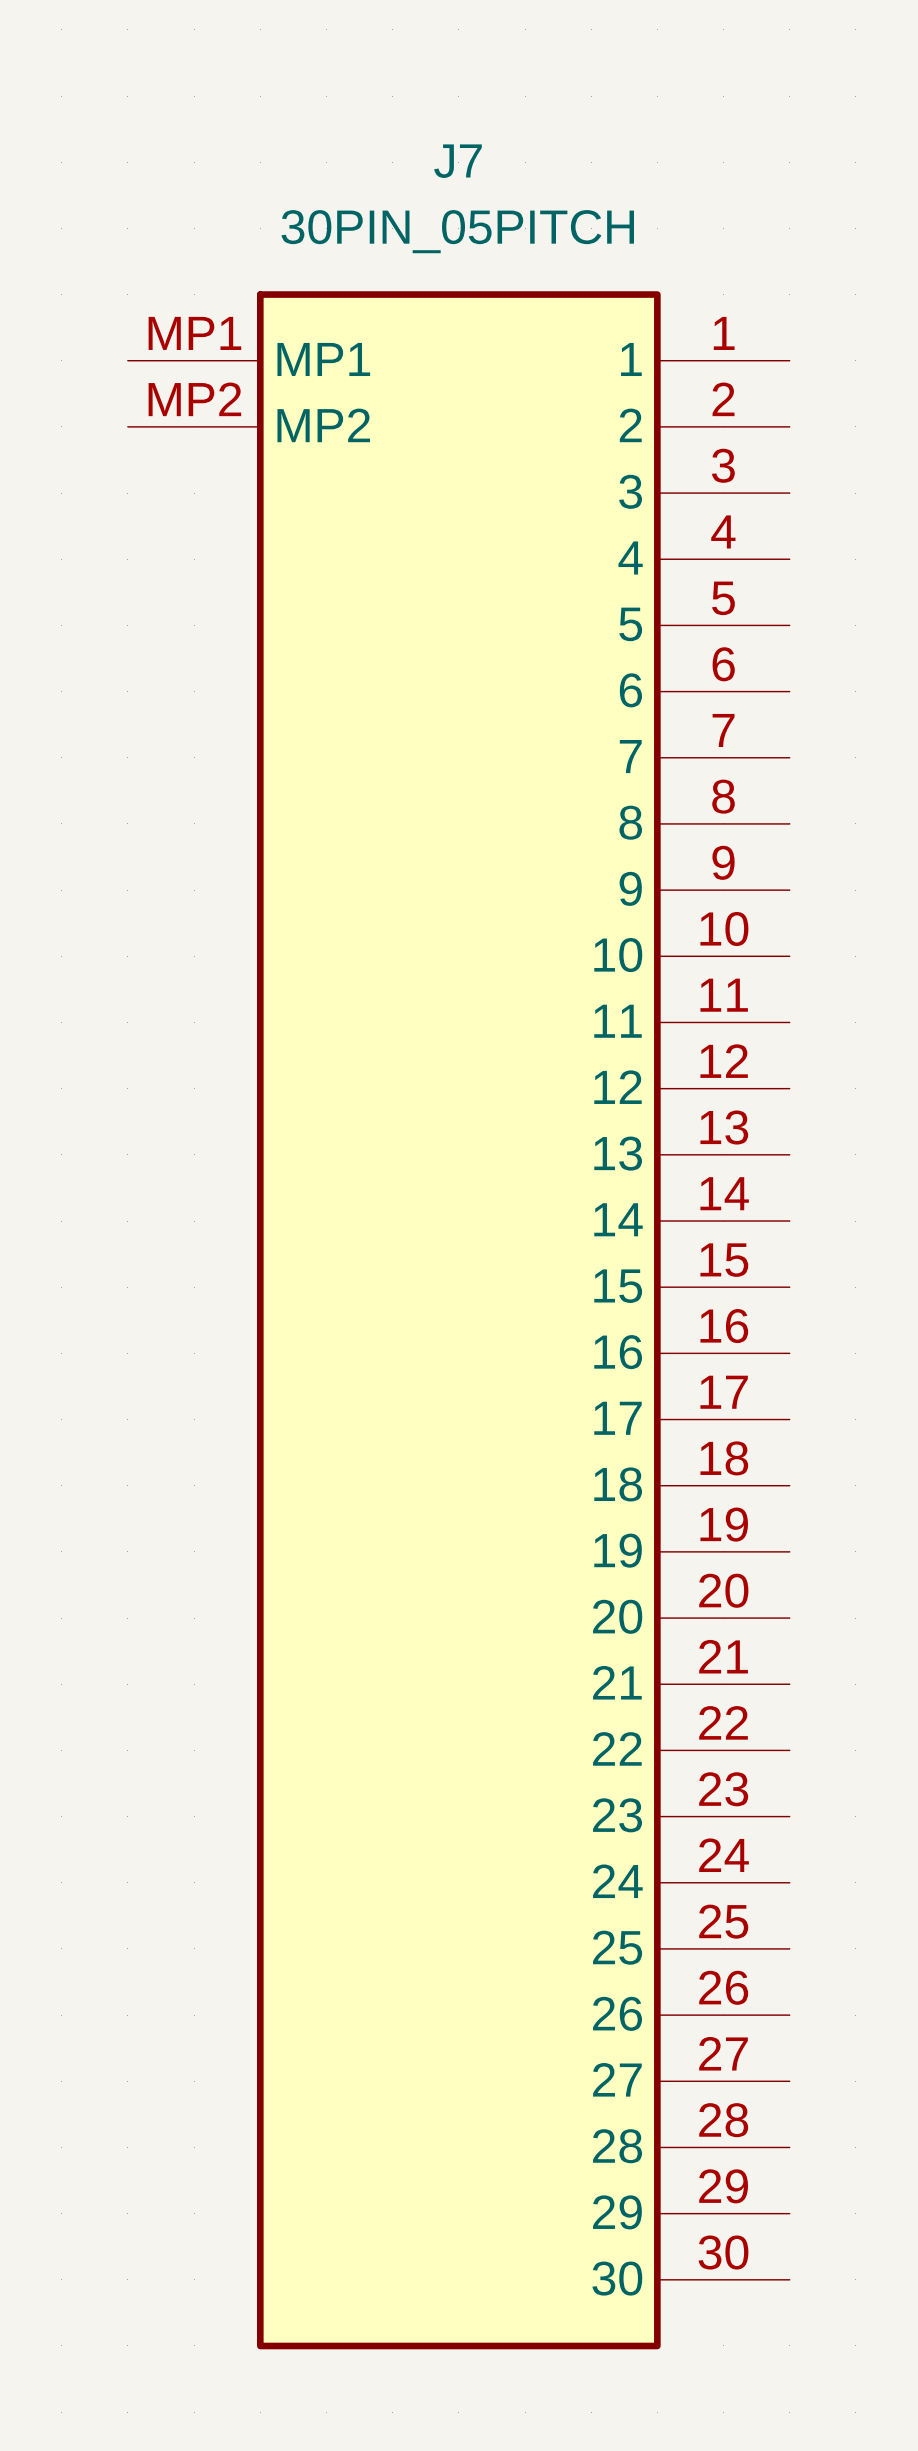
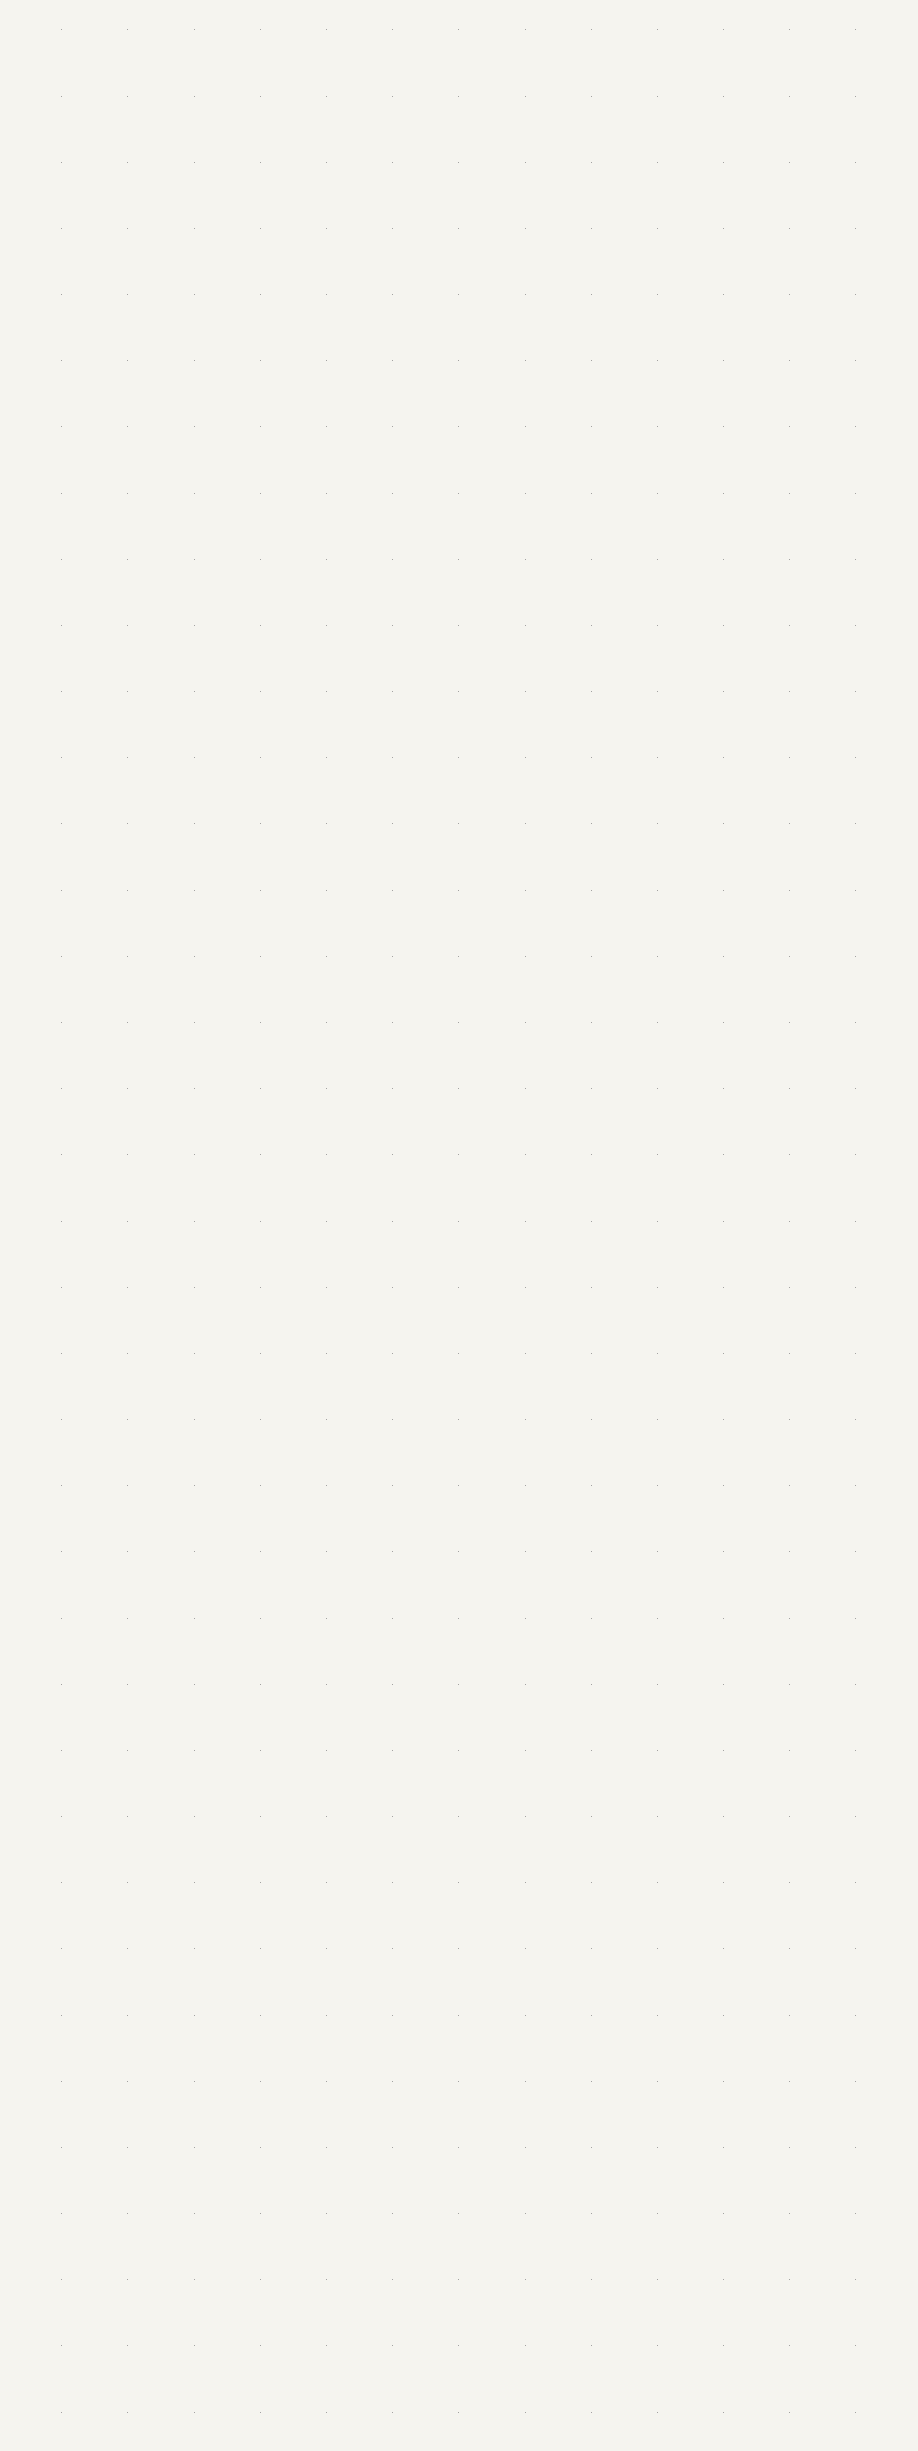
J7: 30PIN_05PITCH (458, 1320) -> none

